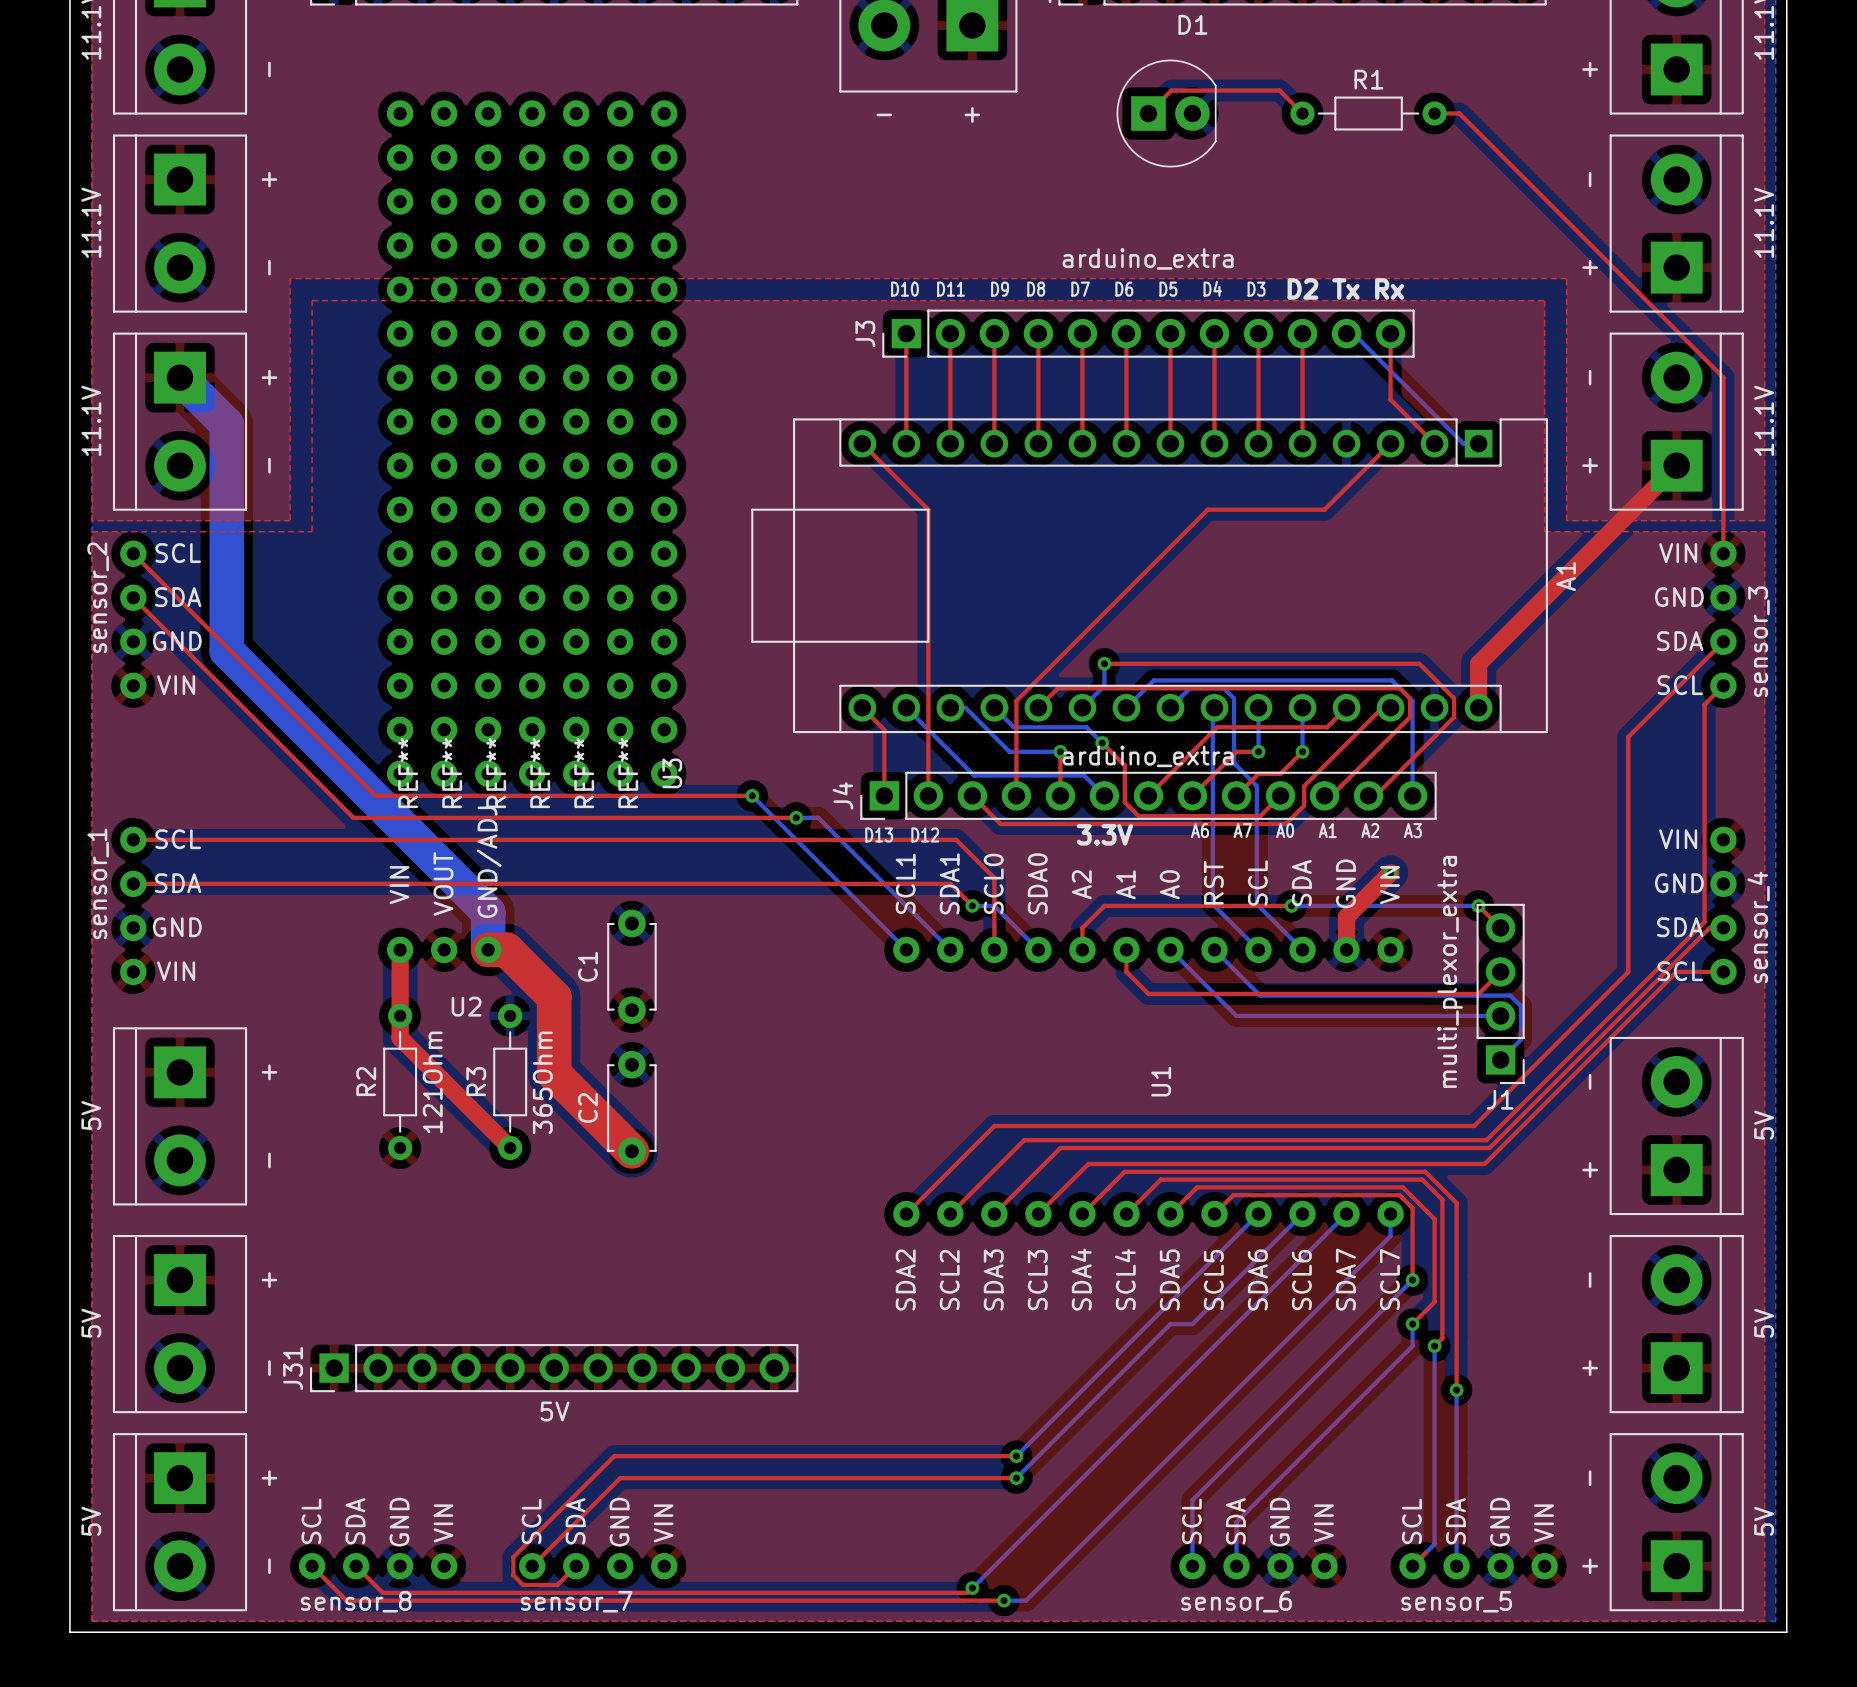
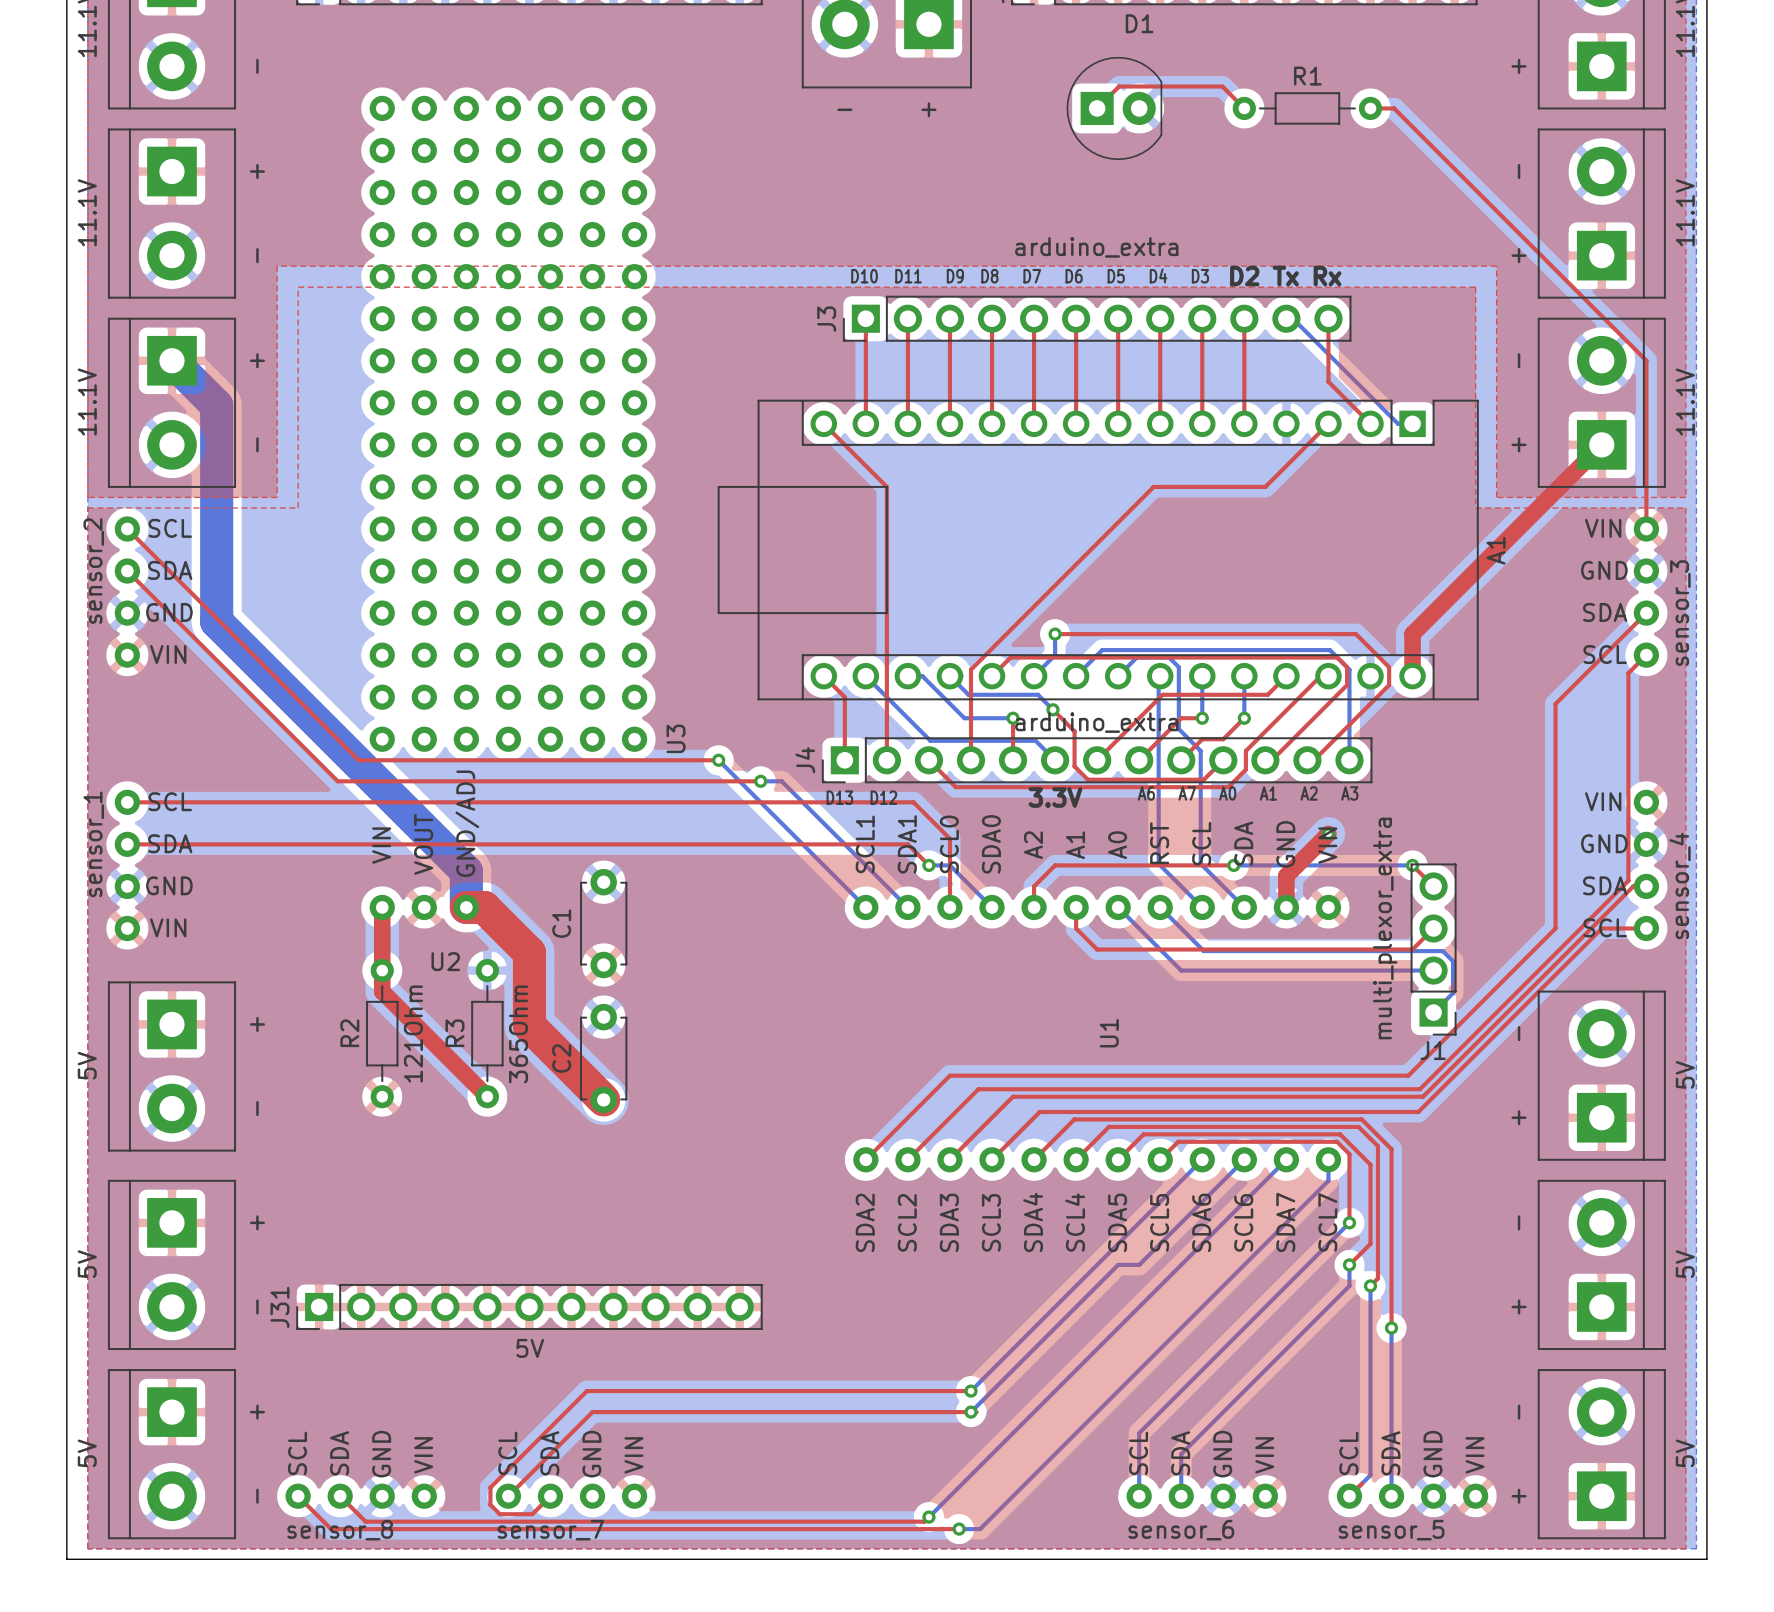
U3 text: REF** (408, 773) -> none
U3 text: REF** (452, 773) -> none
U3 text: REF** (496, 773) -> none
U3 text: REF** (540, 773) -> none
U3 text: REF** (584, 773) -> none
U3 text: REF** (628, 773) -> none
U3 name position: U3 (672, 773) -> U3 (676, 738)

